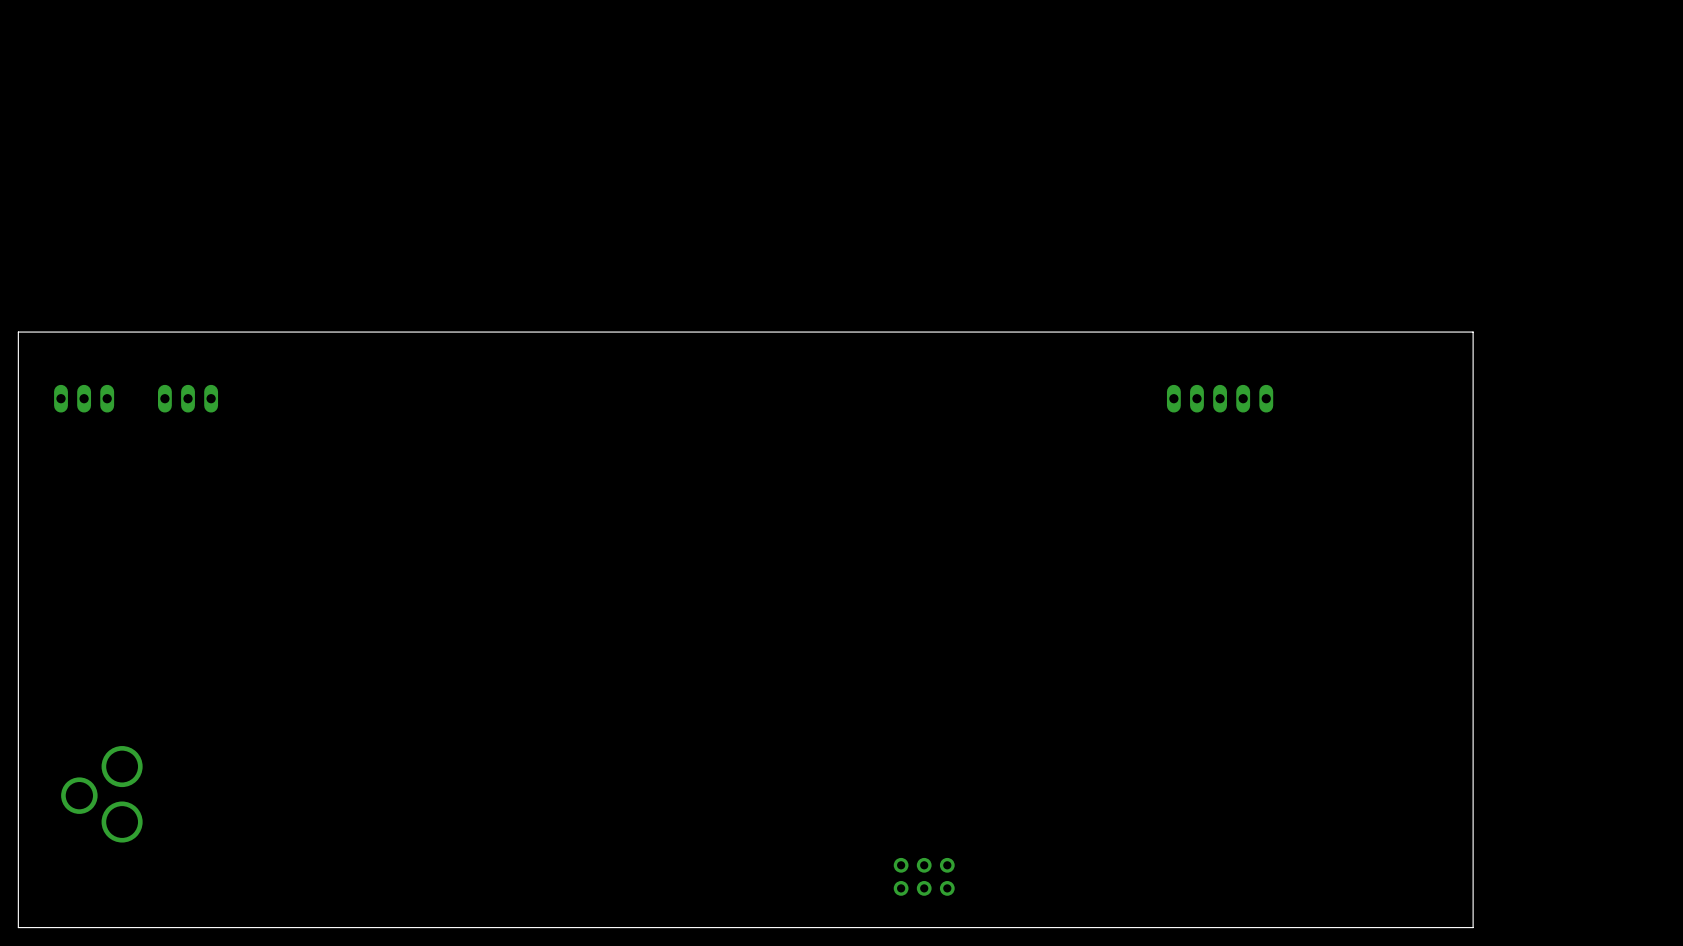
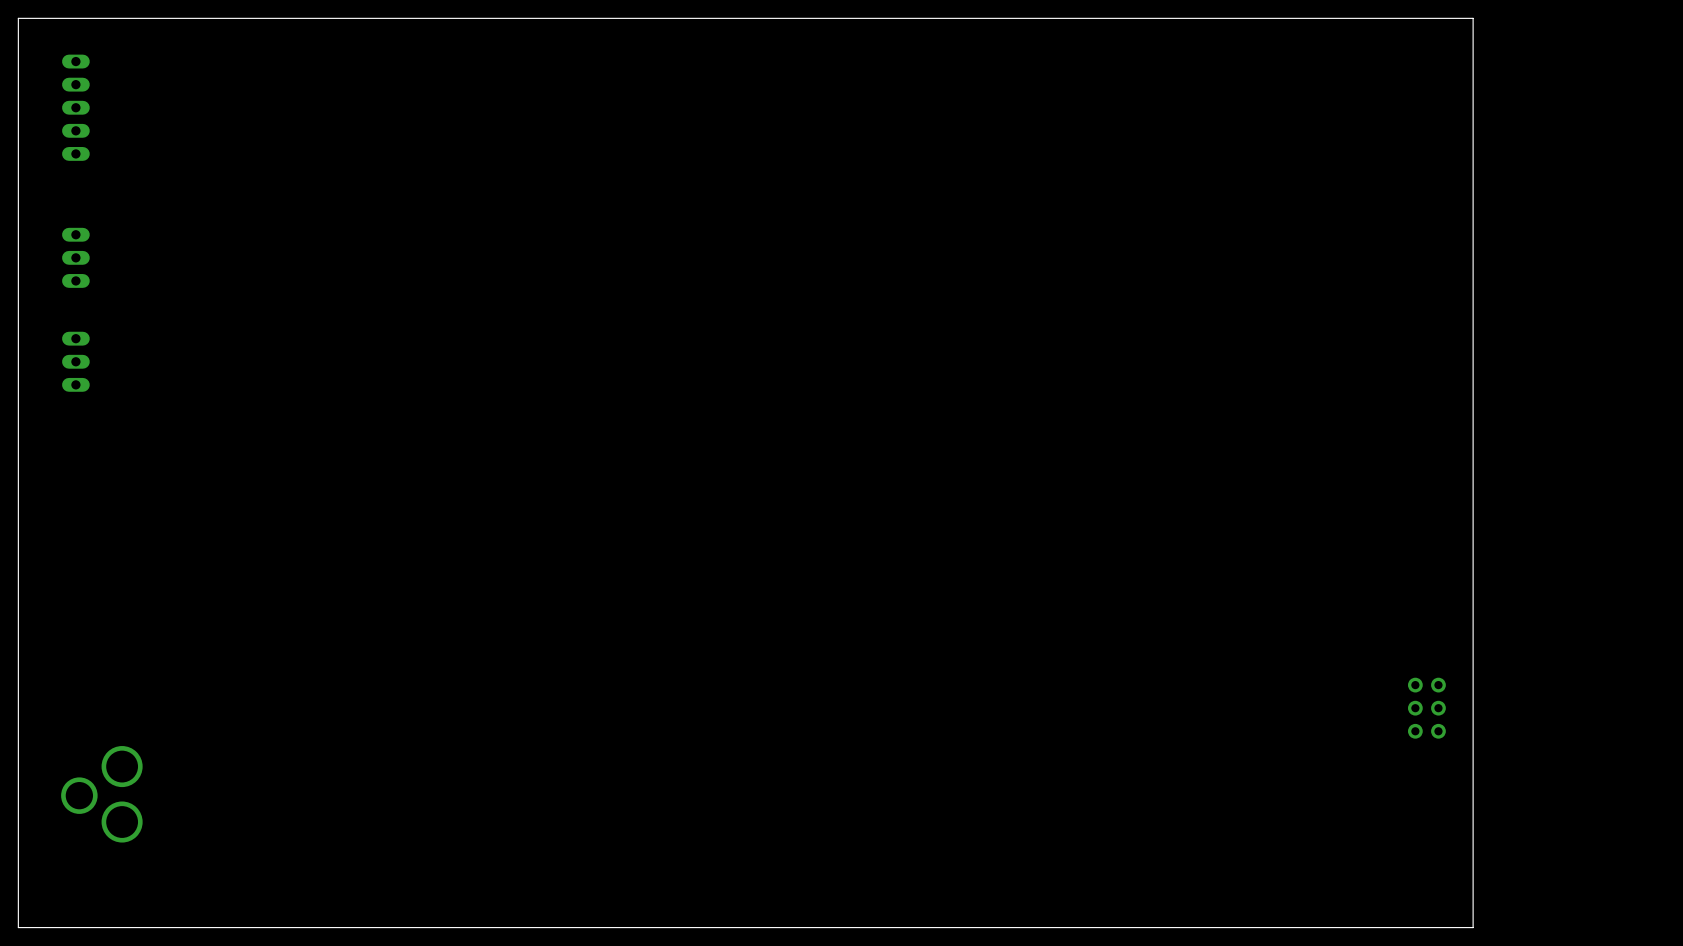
part: none -> (75, 107)
part: none -> (75, 257)
board edge: (1473, 332) (18, 332) -> (1473, 332) (1473, 18) (18, 18) (18, 332)
part rotation: 0° (84, 398) -> 90° clockwise (75, 361)
part position: (84, 398) -> (75, 361)
part: (188, 398) -> none
part: (1220, 398) -> none
part: none -> (1426, 708)
part: (924, 876) -> none

